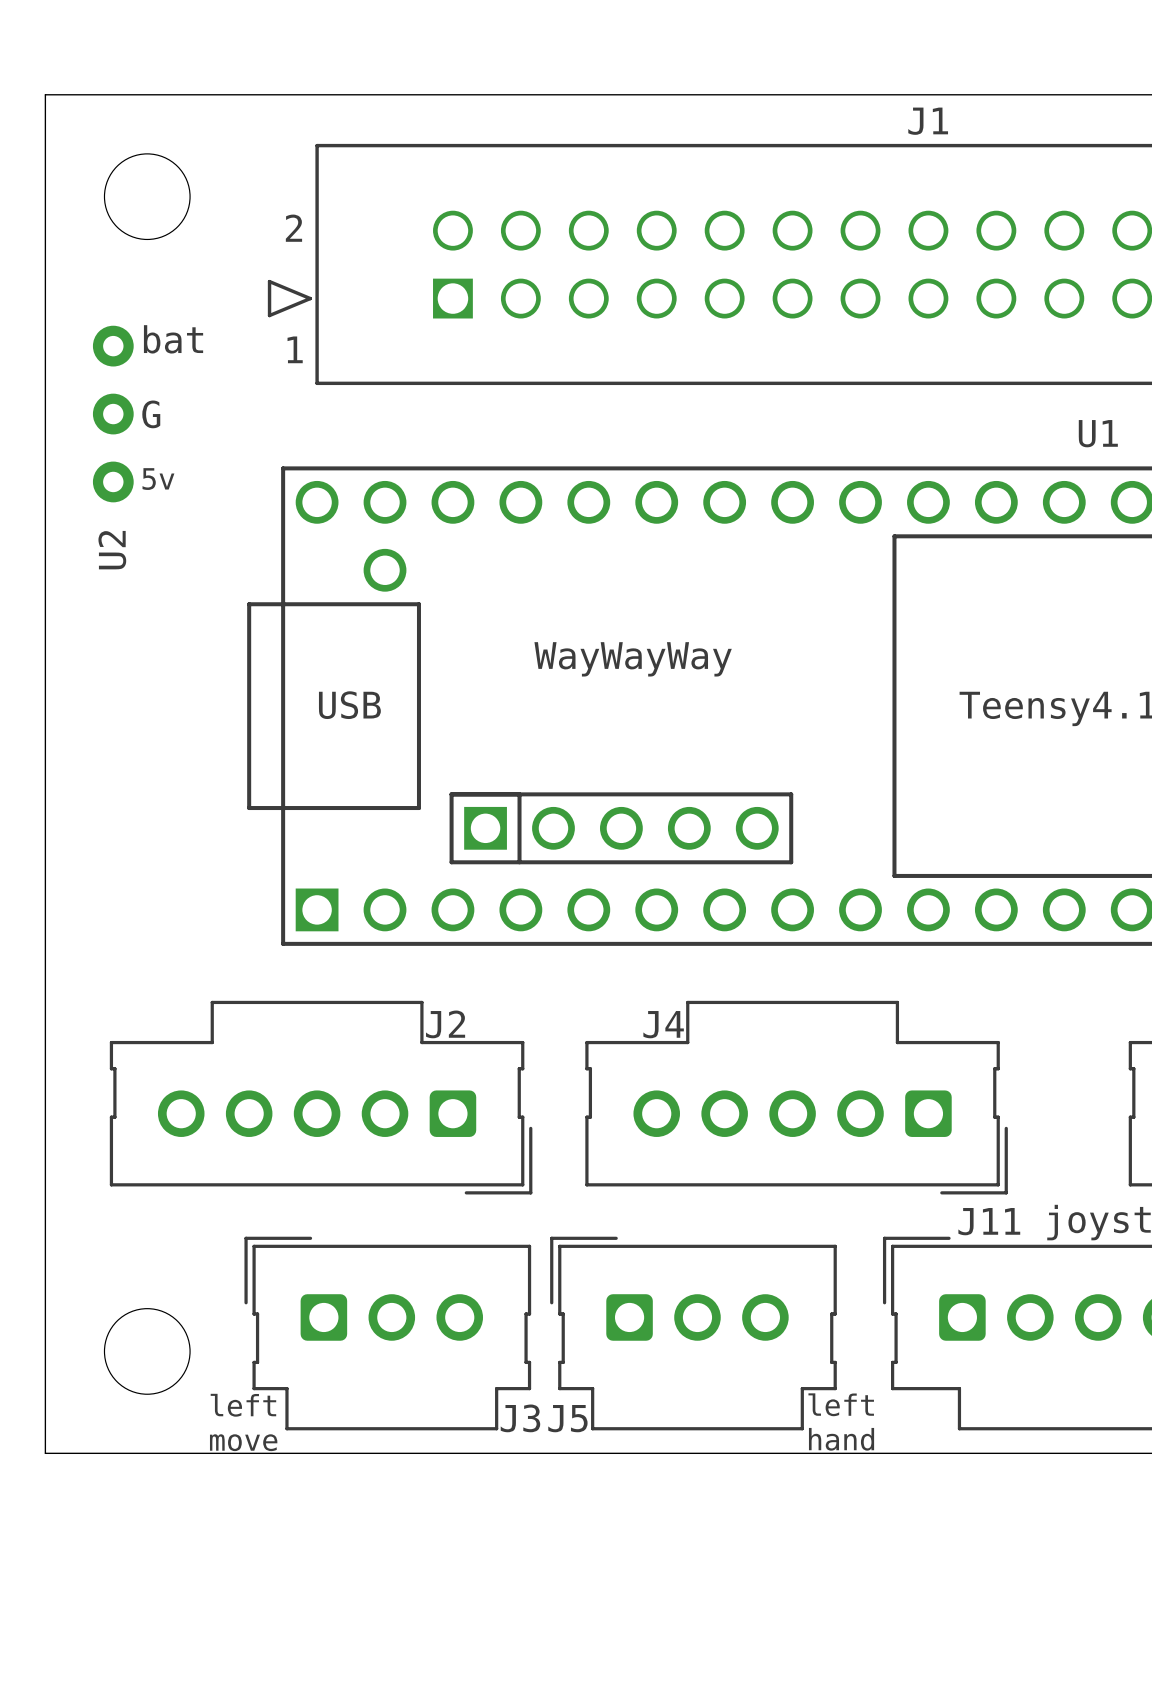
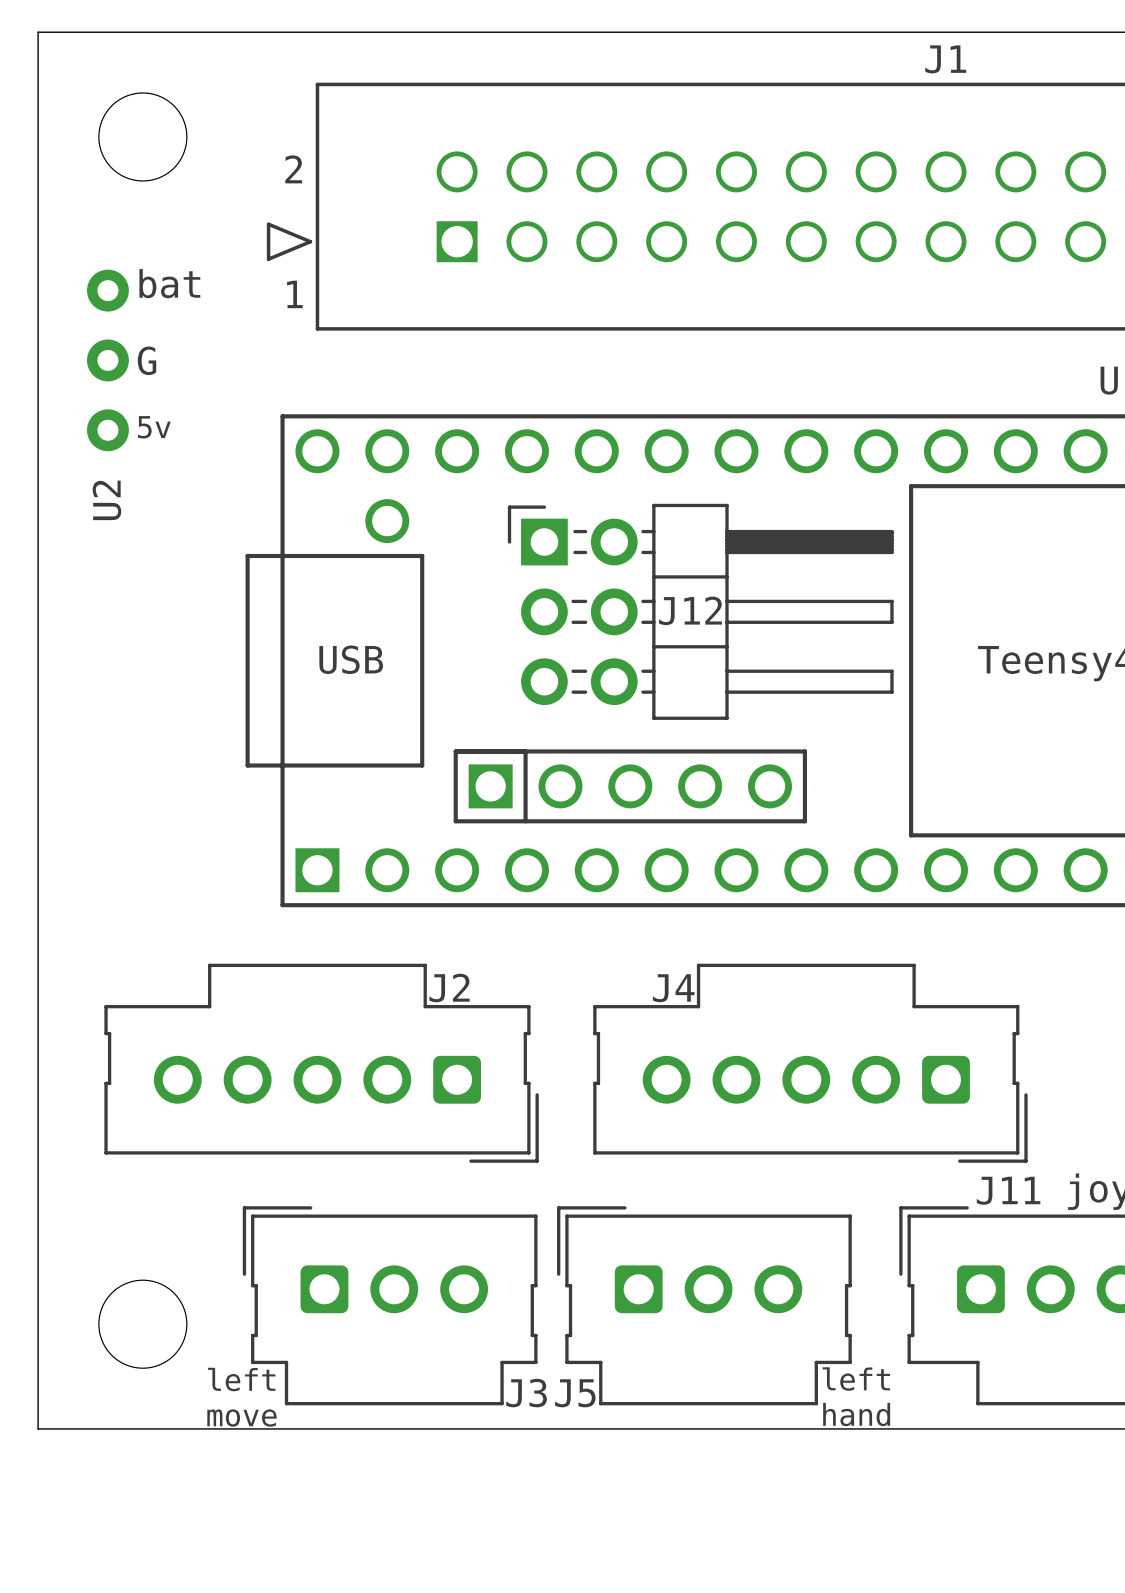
J12: none -> (700, 611)
text: WayWayWay (633, 659) -> none

